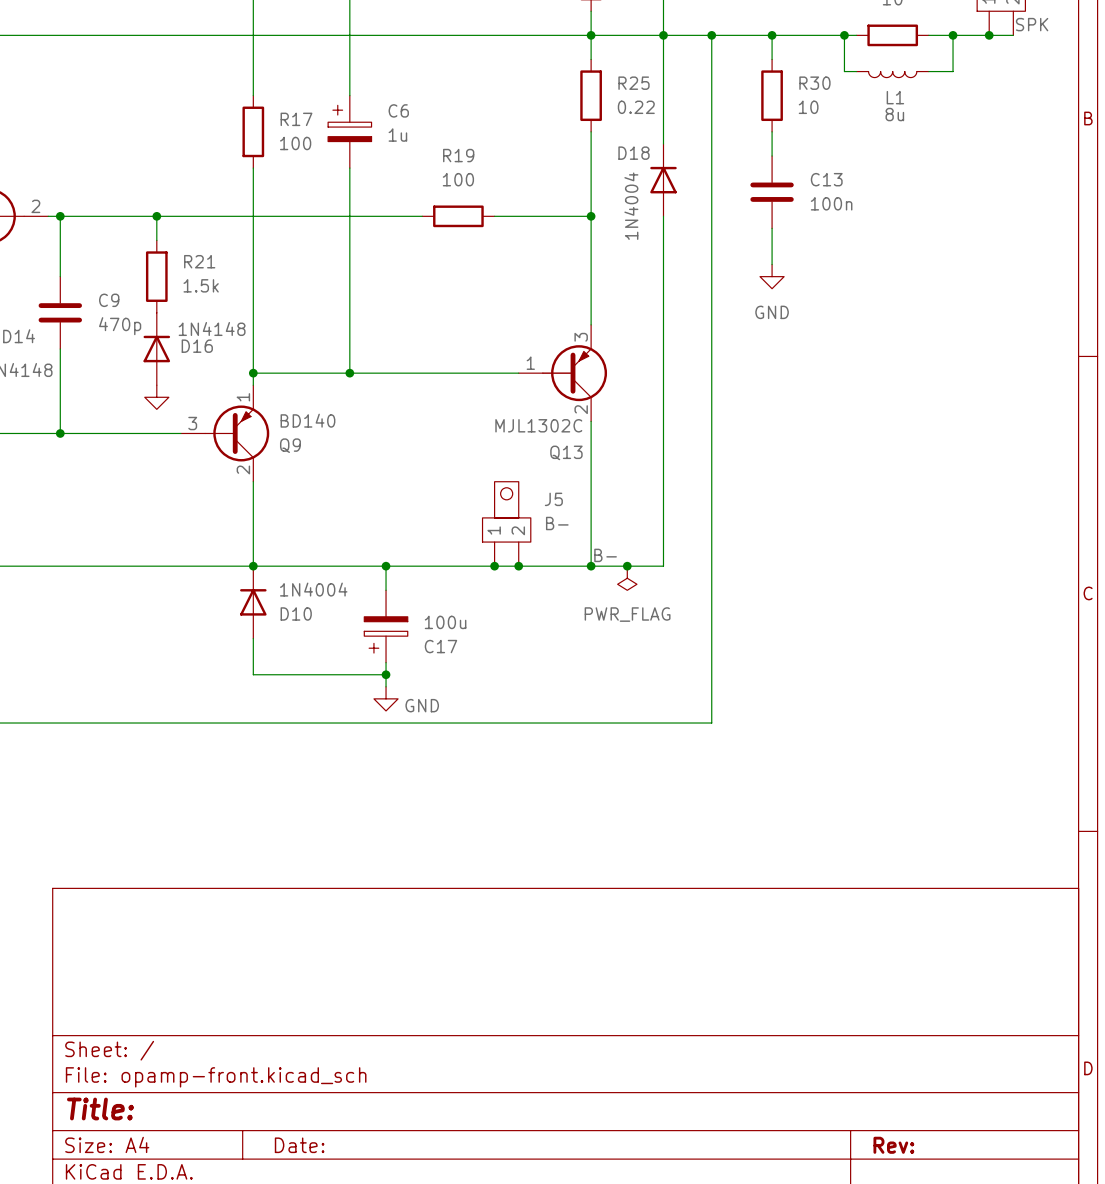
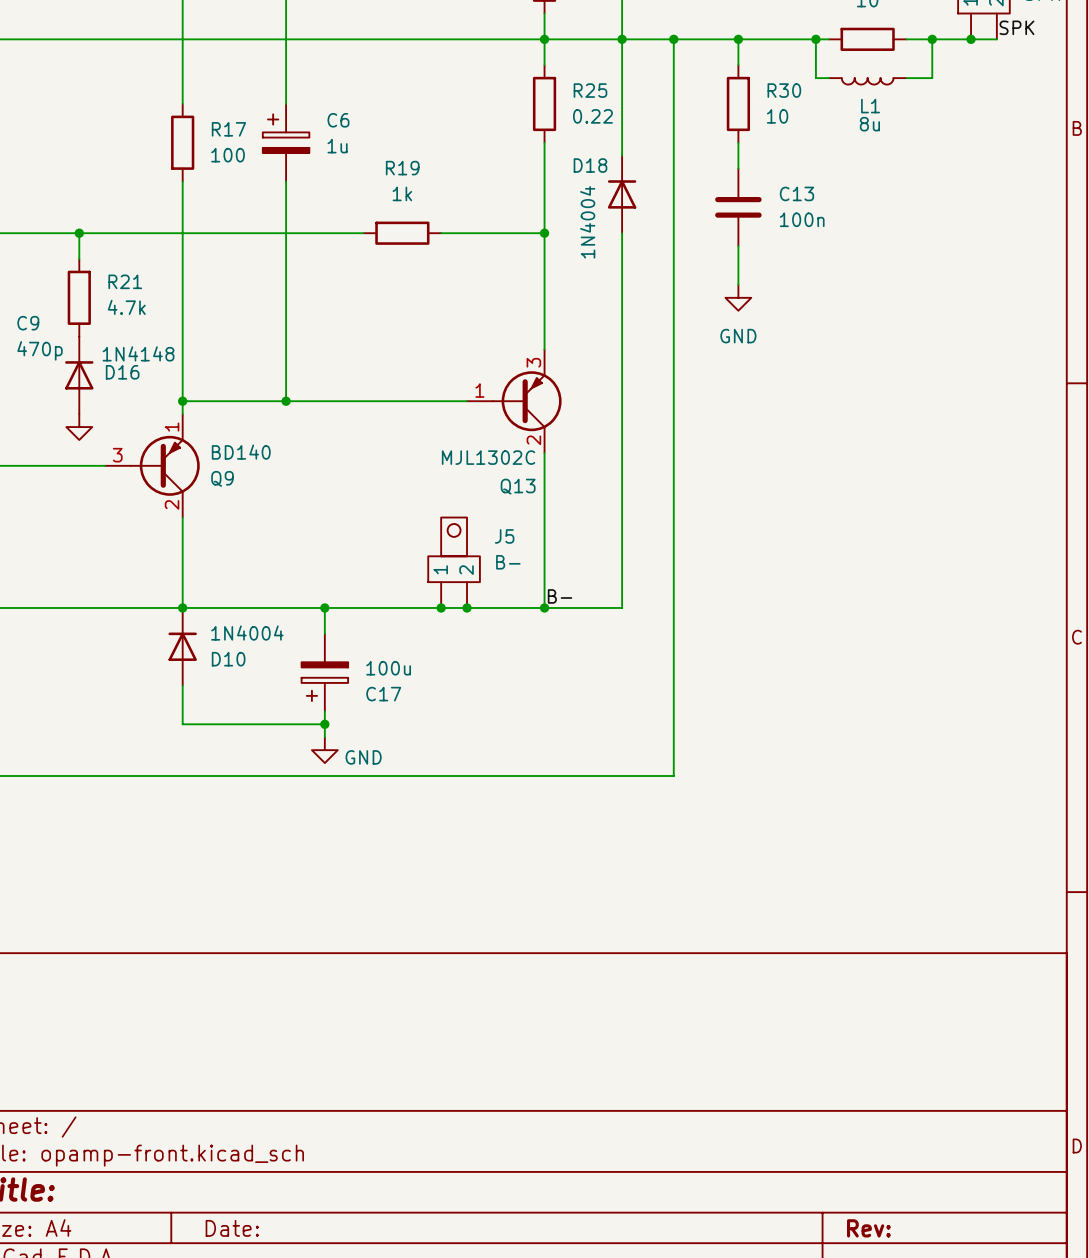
R19 value: 100 (458, 179) -> 1k (402, 193)
R21 value: 1.5k (201, 285) -> 4.7k (126, 307)
junction: (627, 566) -> none
power symbol: PWR_FLAG (627, 578) -> none

